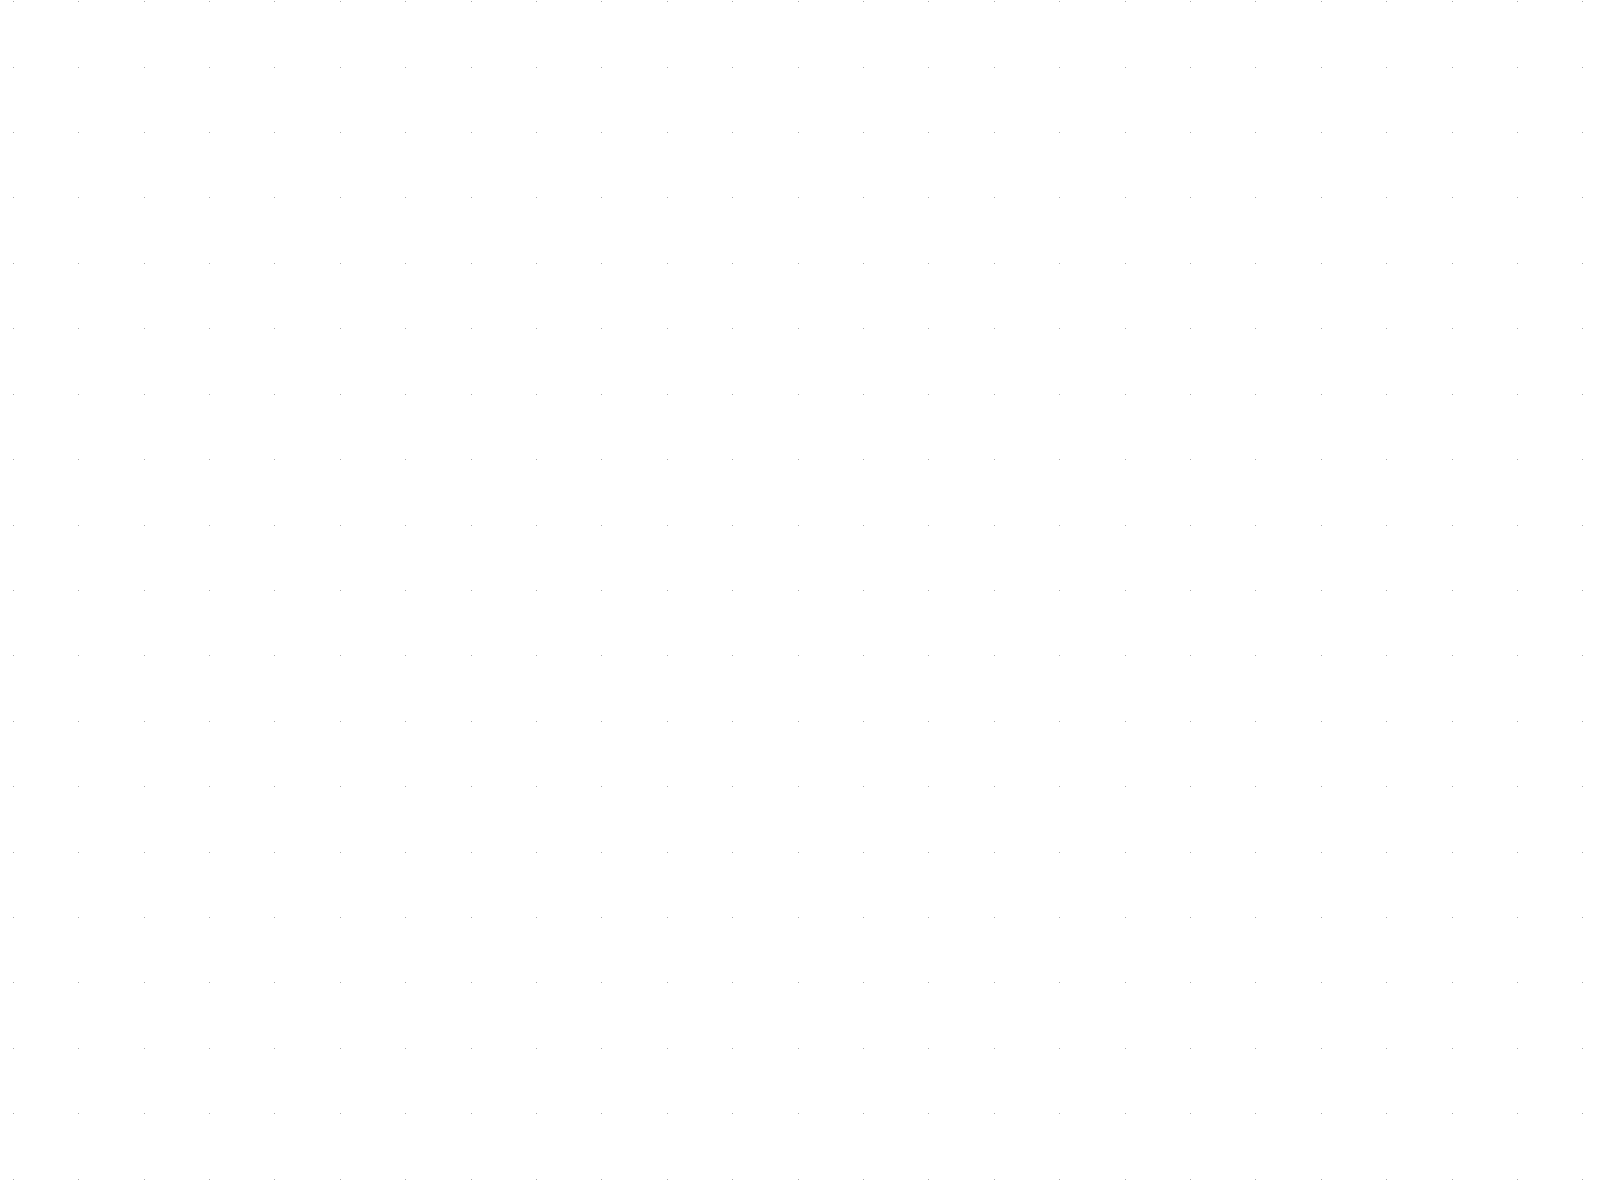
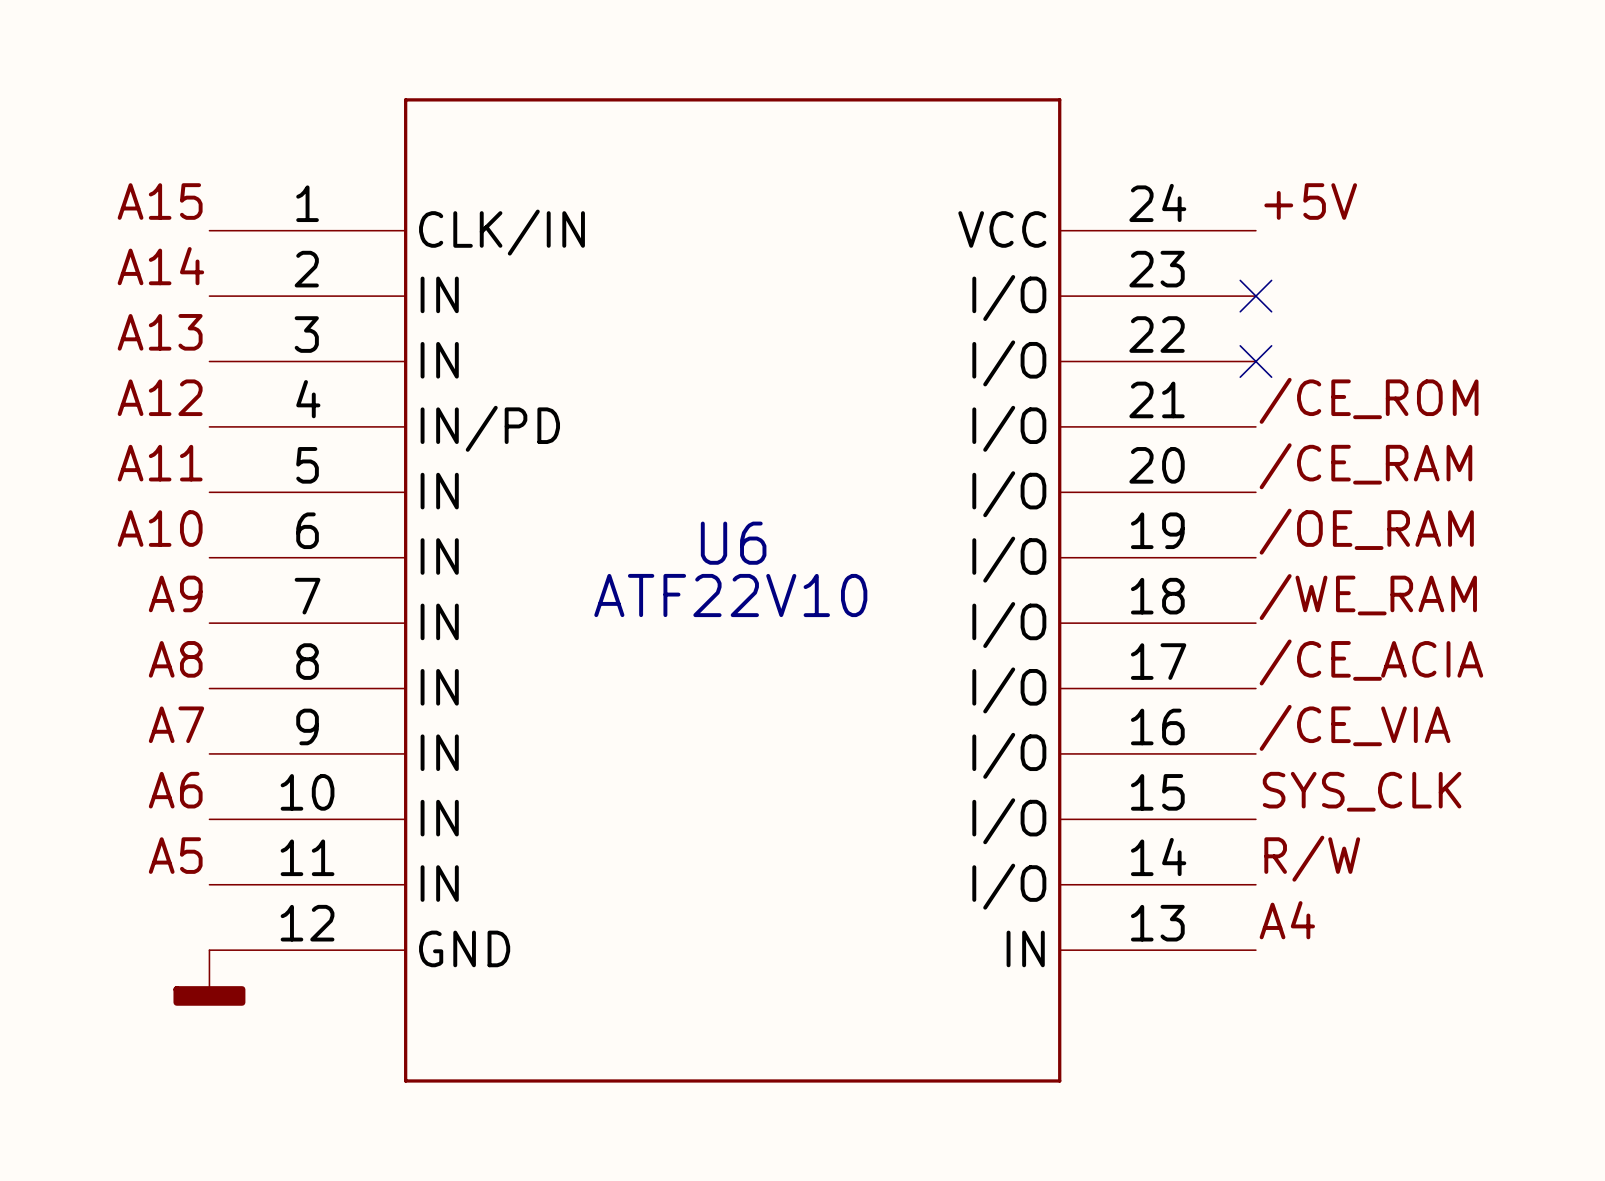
label: none -> A15 (160, 201)
label: none -> +5V (1310, 201)
label: none -> A14 (160, 266)
no-connect mark: none -> (1255, 296)
label: none -> A13 (160, 332)
no-connect mark: none -> (1255, 361)
label: none -> A12 (160, 397)
label: none -> /CE_ROM (1369, 400)
label: none -> A11 (160, 463)
label: none -> /CE_RAM (1365, 466)
label: none -> A10 (160, 528)
label: none -> /OE_RAM (1366, 531)
U6: none -> ATF22V10 (732, 590)
label: none -> A9 (175, 593)
label: none -> /WE_RAM (1368, 597)
label: none -> A8 (175, 659)
label: none -> /CE_ACIA (1371, 662)
label: none -> A7 (176, 724)
label: none -> /CE_VIA (1355, 727)
label: none -> A6 (175, 790)
label: none -> SYS_CLK (1362, 791)
label: none -> A5 (175, 855)
label: none -> R/W (1312, 858)
label: none -> A4 (1287, 920)
power symbol: none -> (209, 977)

